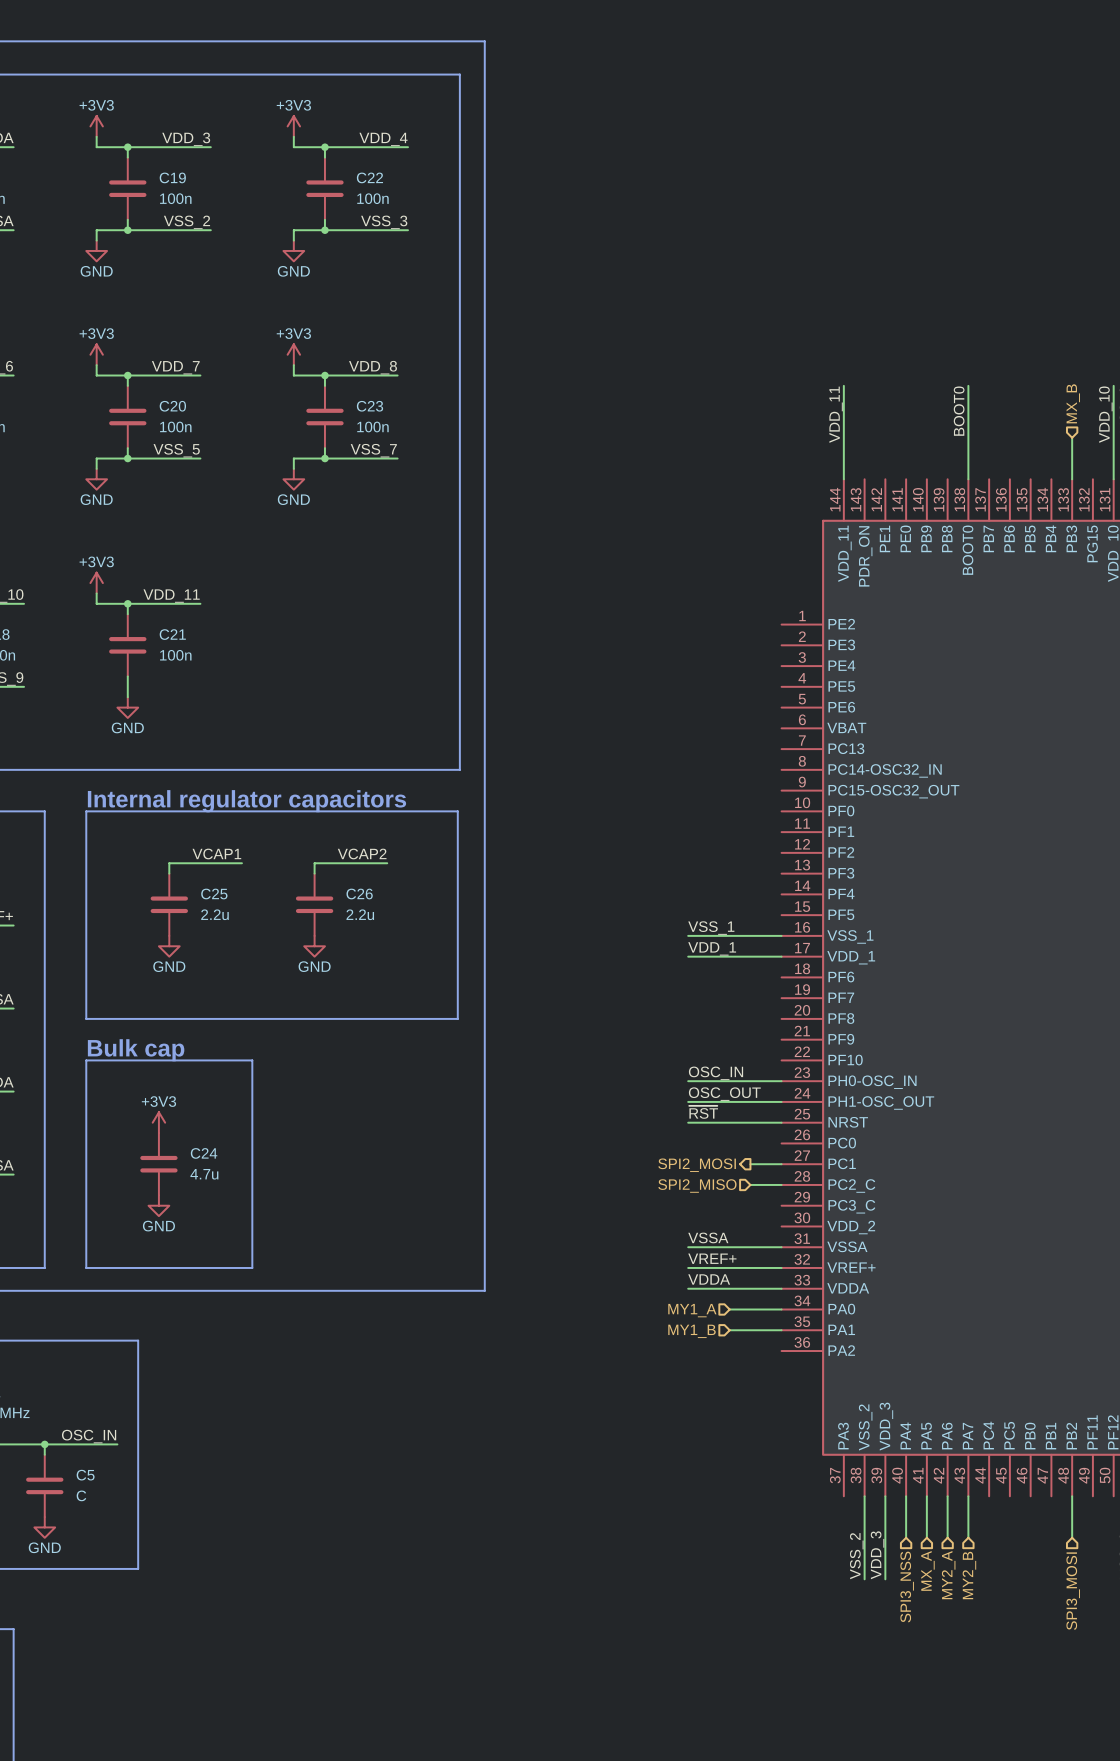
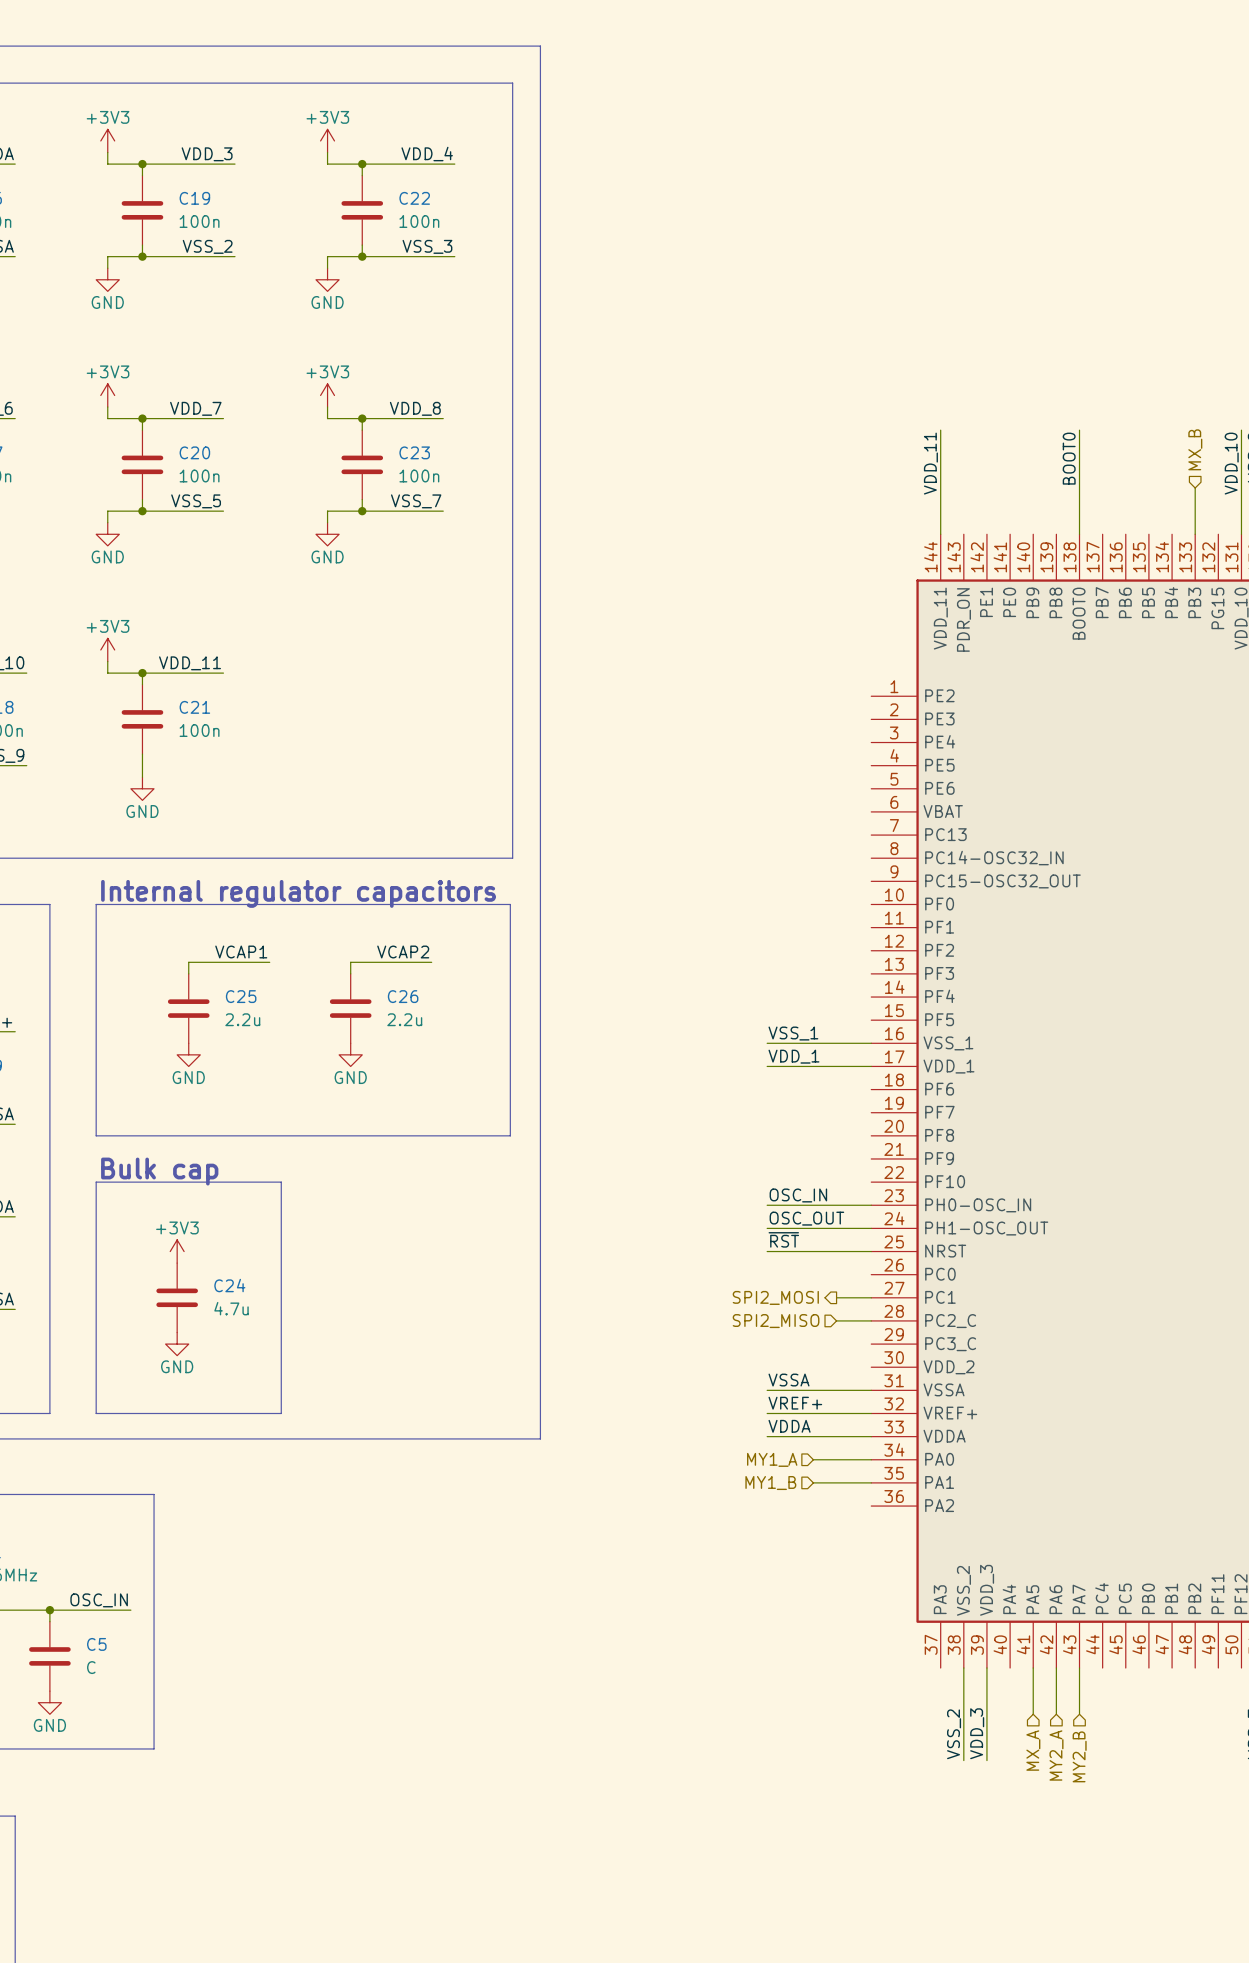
wire: (906, 1496) (906, 1537) -> none
wire: (1072, 1496) (1072, 1537) -> none
hierarchical label: SPI3_NSS (907, 1587) -> none
hierarchical label: SPI3_MOSI (1073, 1591) -> none

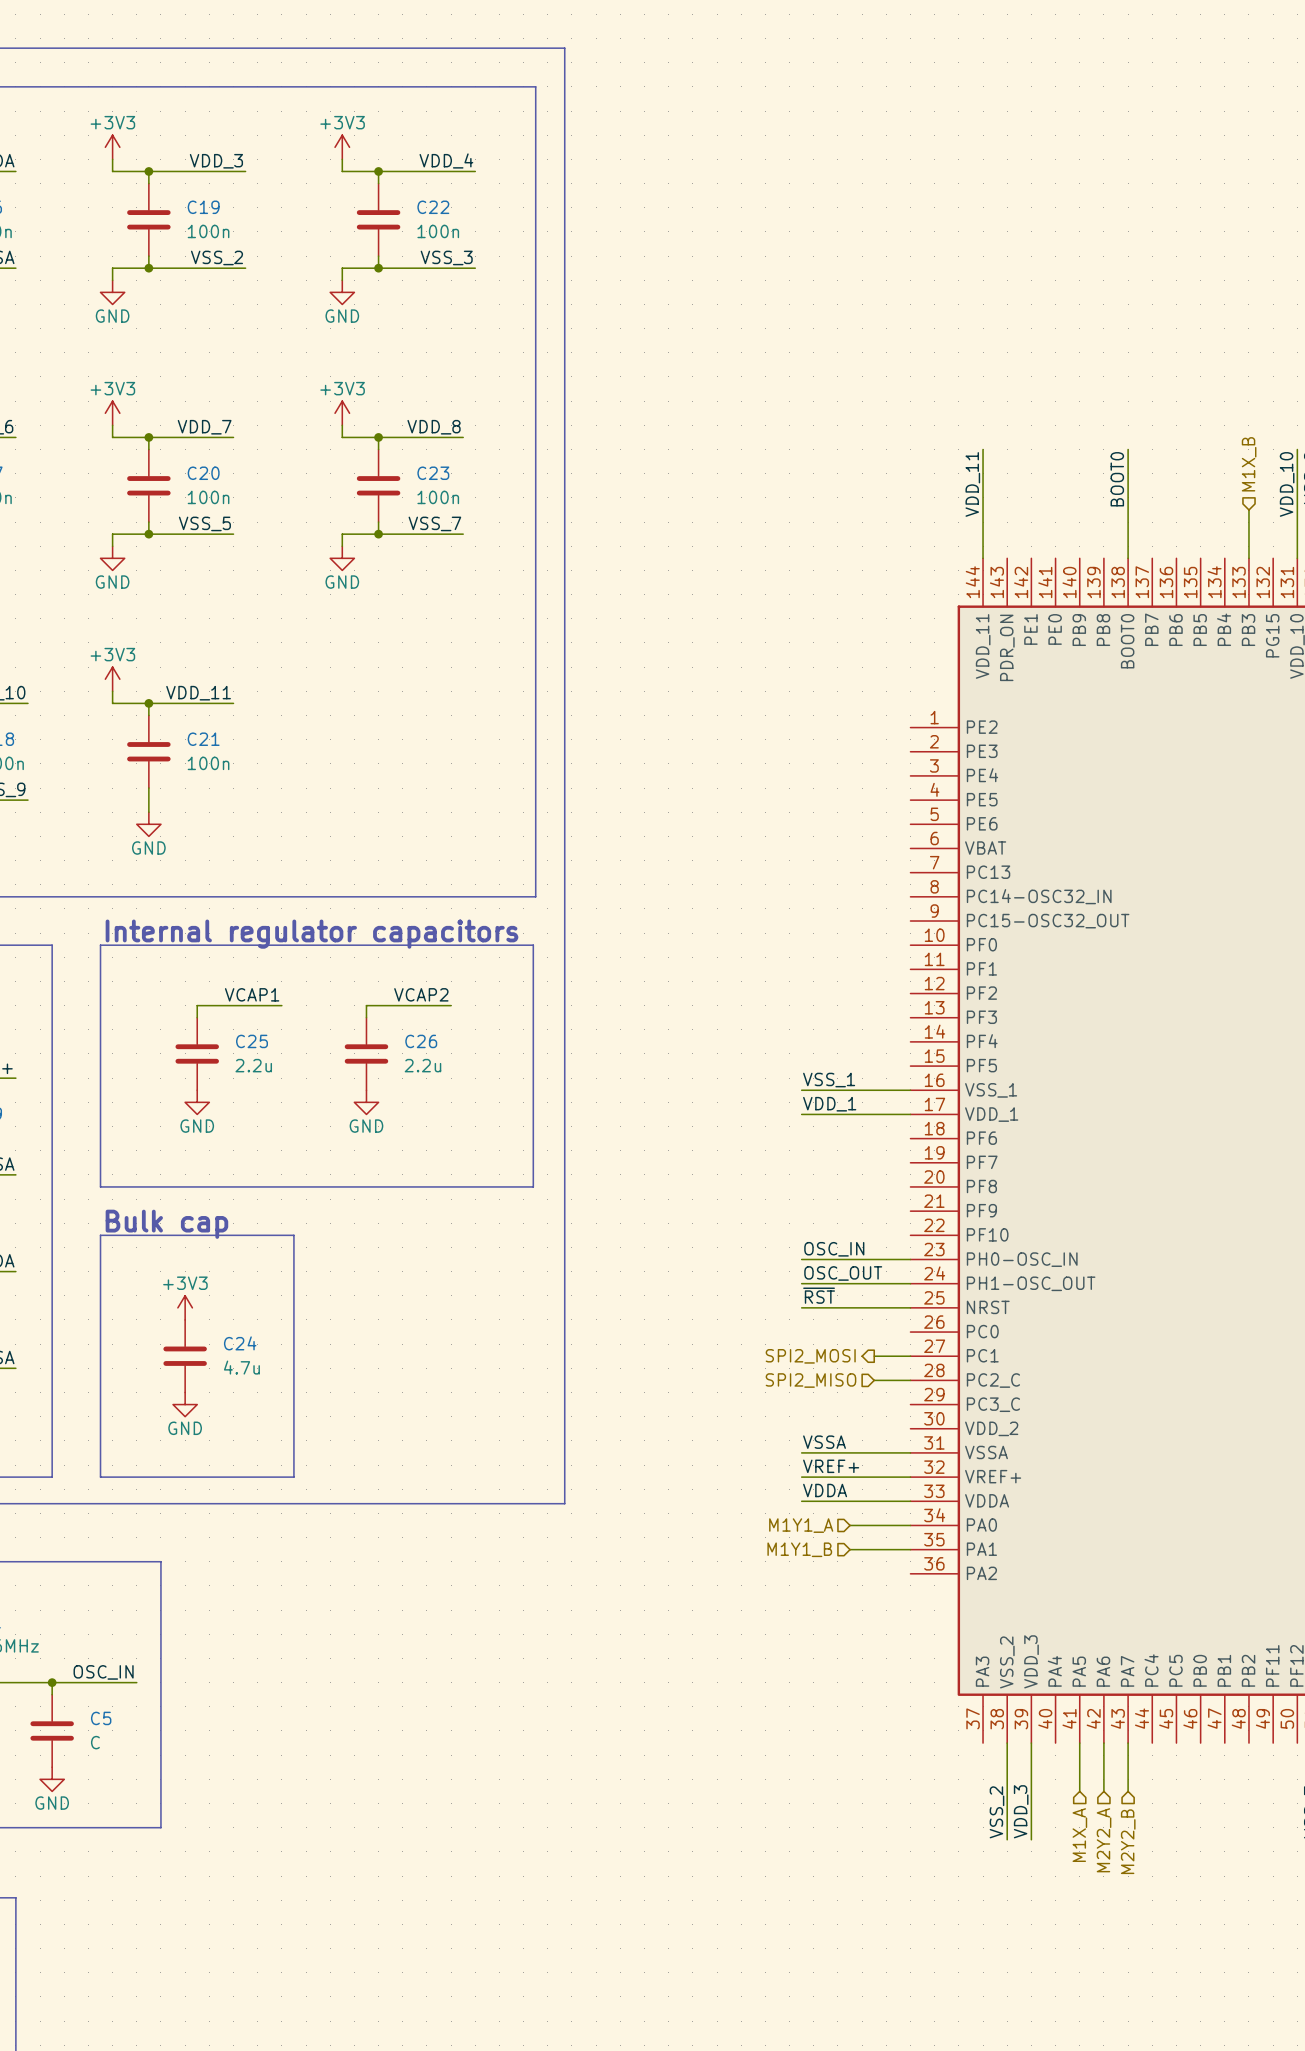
hierarchical label: MX_B (1195, 449) -> M1X_B (1249, 464)
hierarchical label: MY1_A (772, 1459) -> M1Y1_A (801, 1525)
hierarchical label: MY1_B (770, 1483) -> M1Y1_B (799, 1549)
hierarchical label: MX_A (1033, 1750) -> M1X_A (1079, 1835)
hierarchical label: MY2_A (1056, 1755) -> M2Y2_A (1104, 1840)
hierarchical label: MY2_B (1079, 1756) -> M2Y2_B (1128, 1841)

